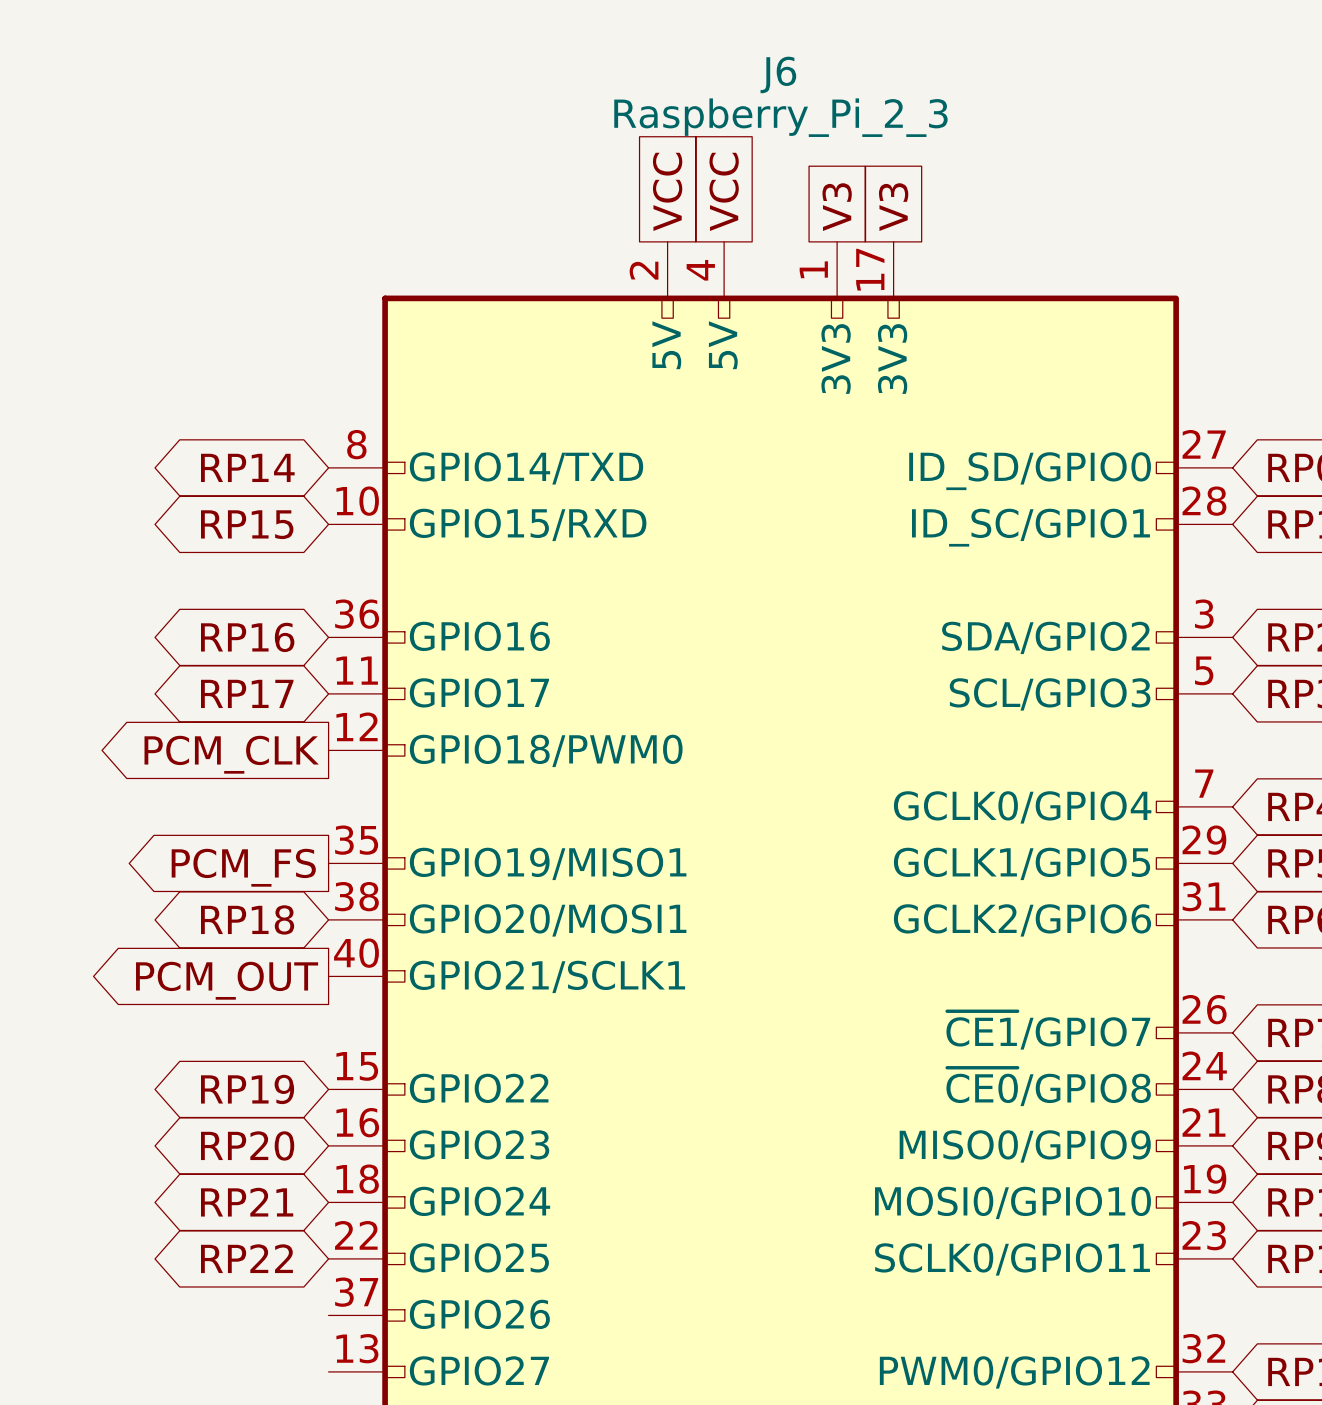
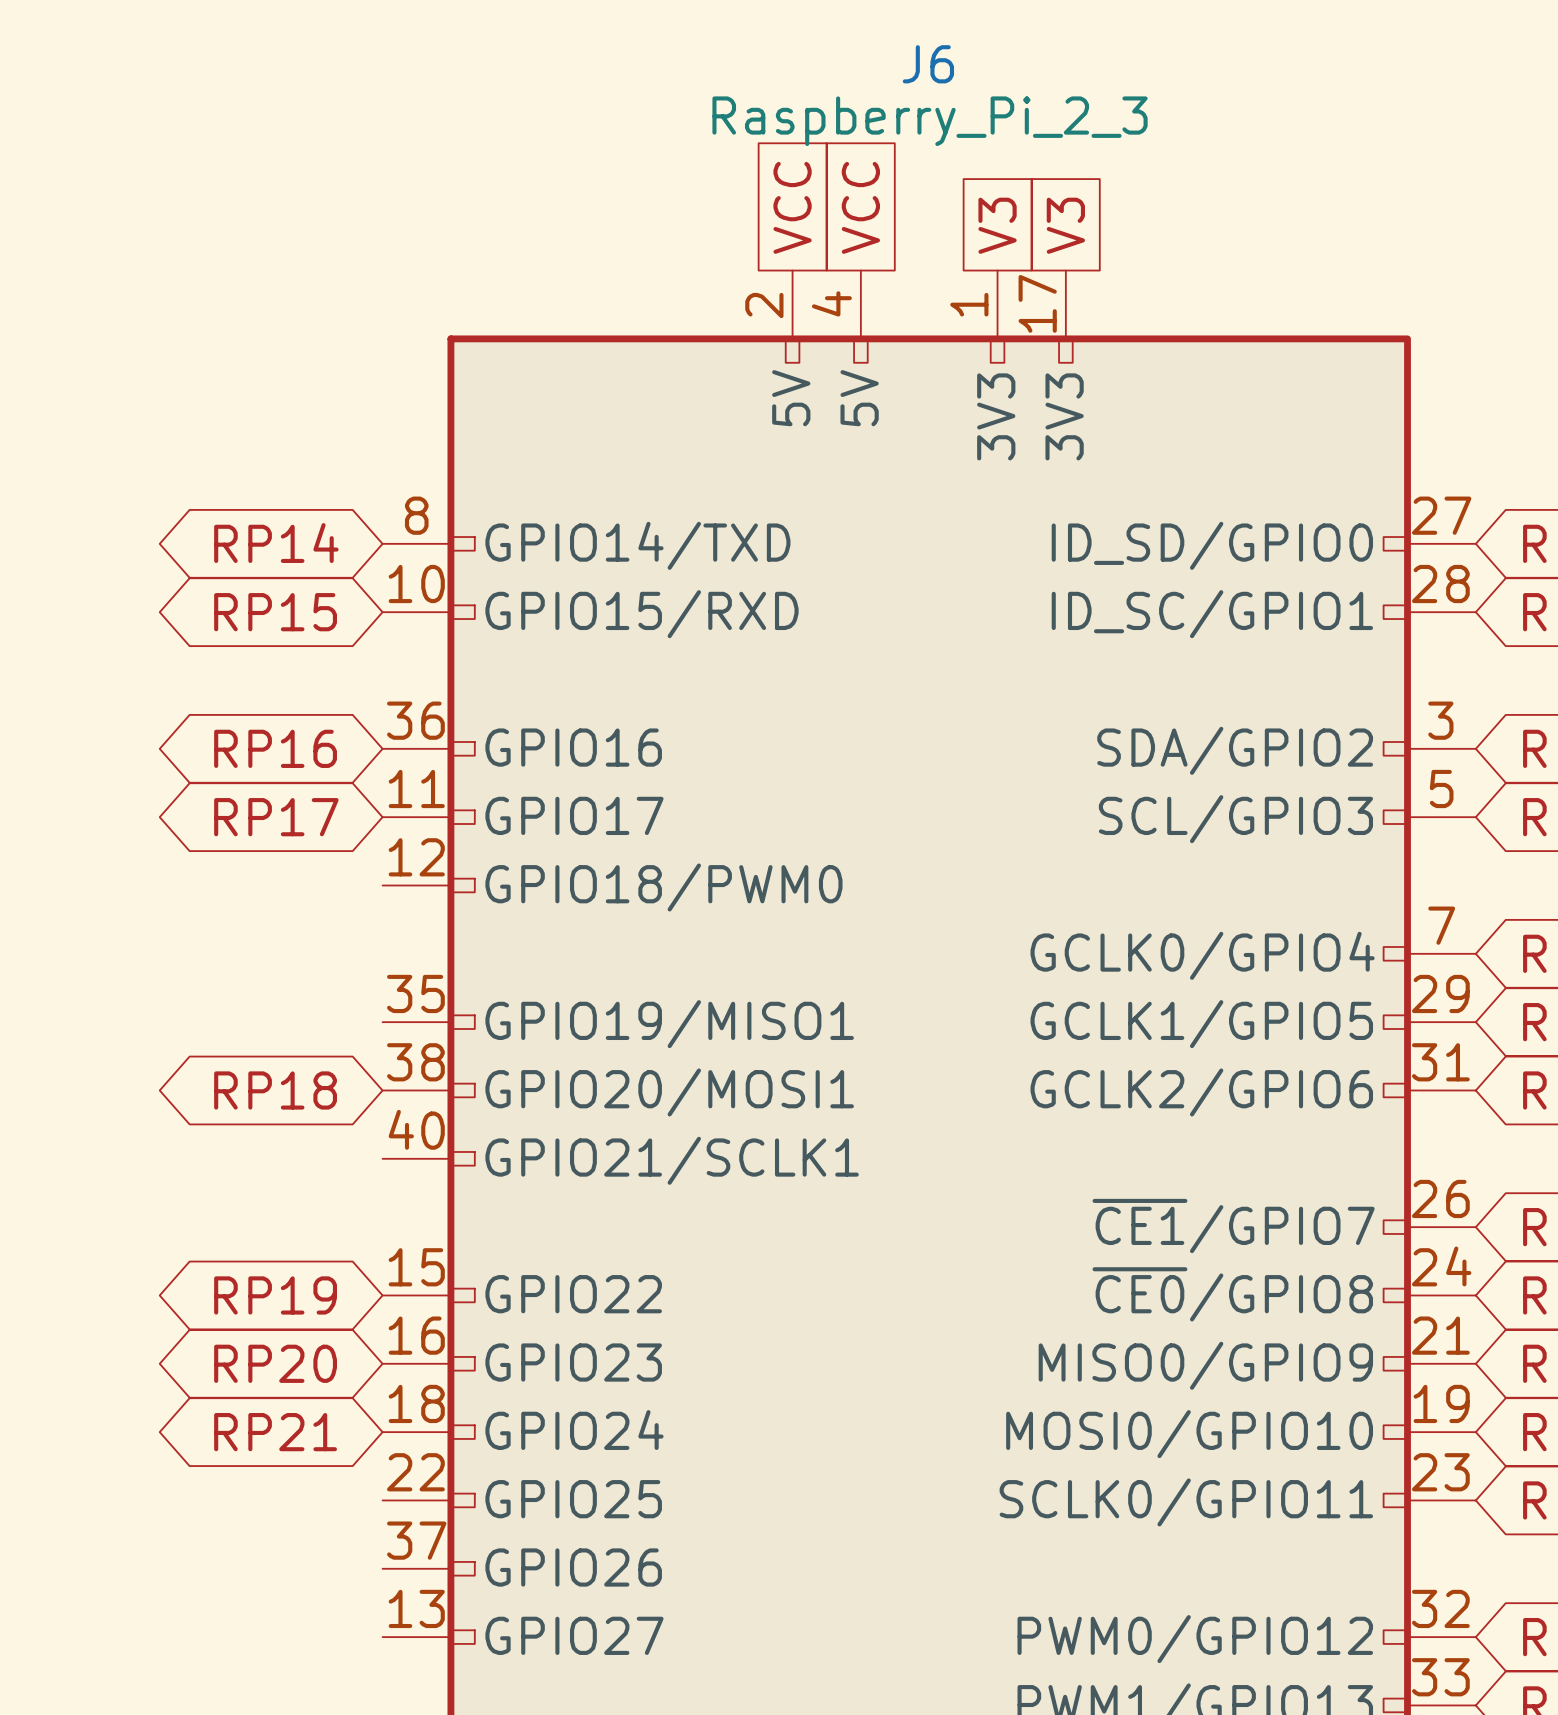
global label: PCM_CLK (231, 754) -> none
global label: PCM_FS (243, 867) -> none
global label: PCM_OUT (227, 980) -> none
global label: RP22 (246, 1258) -> none

